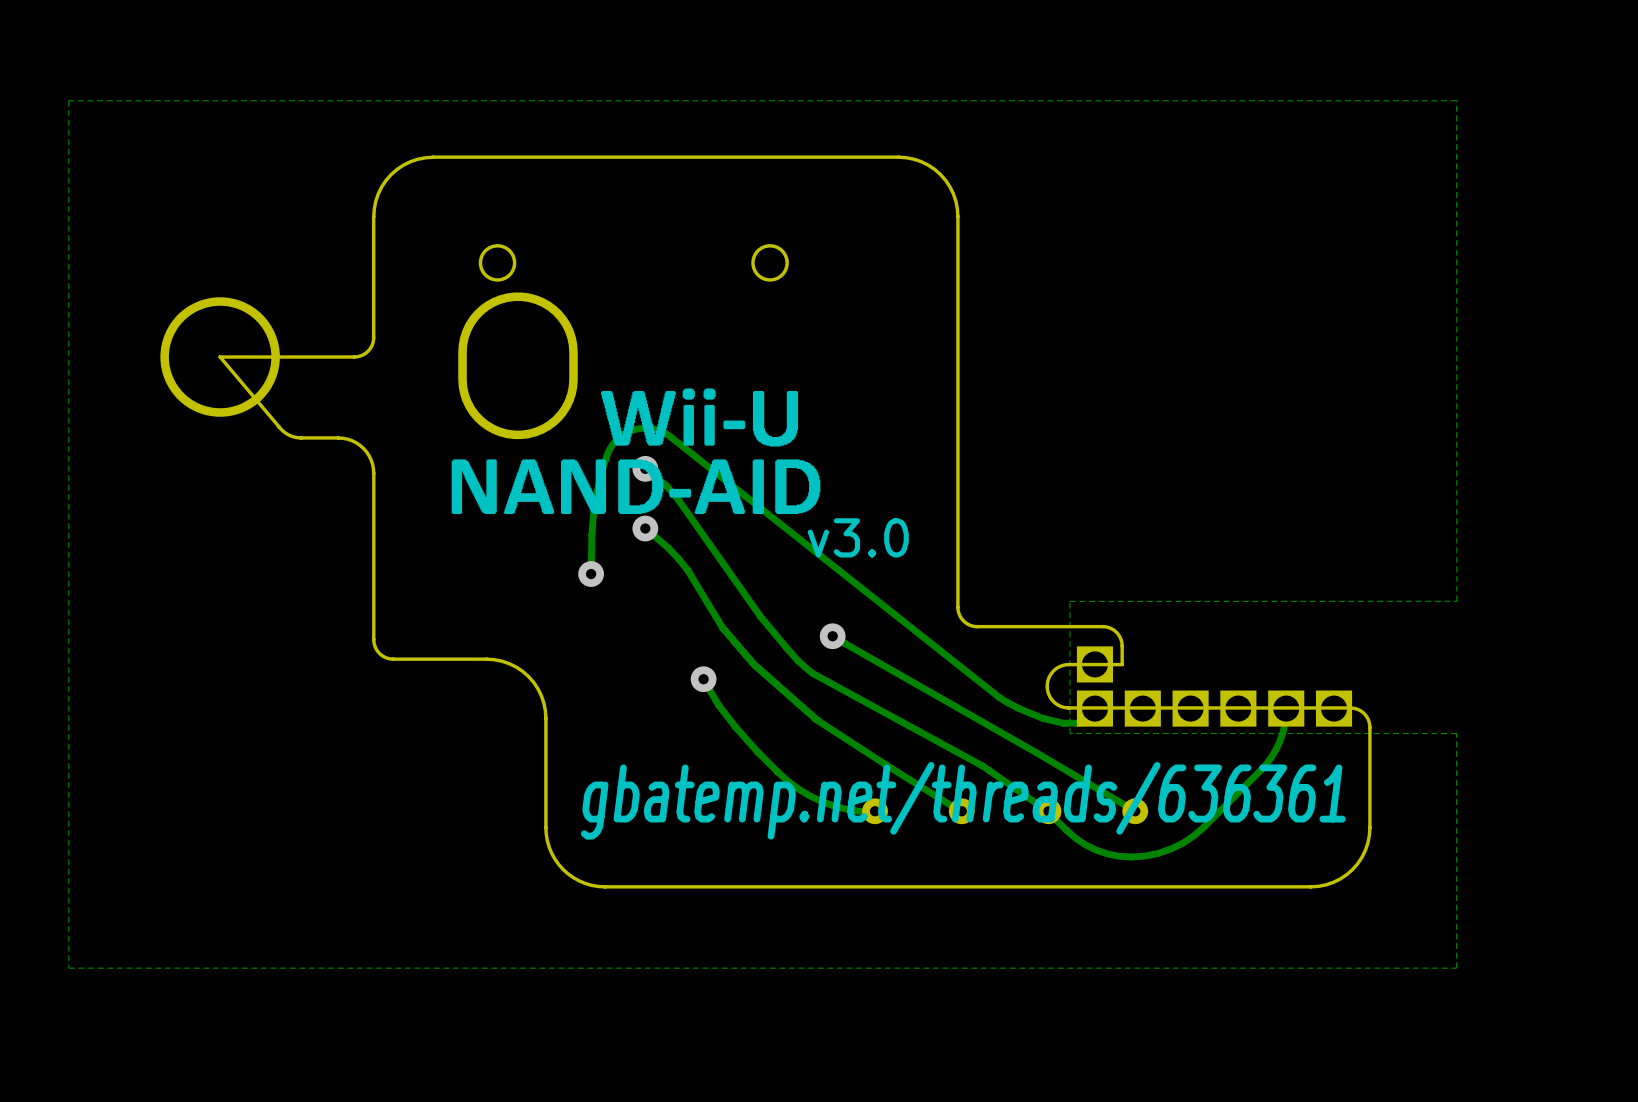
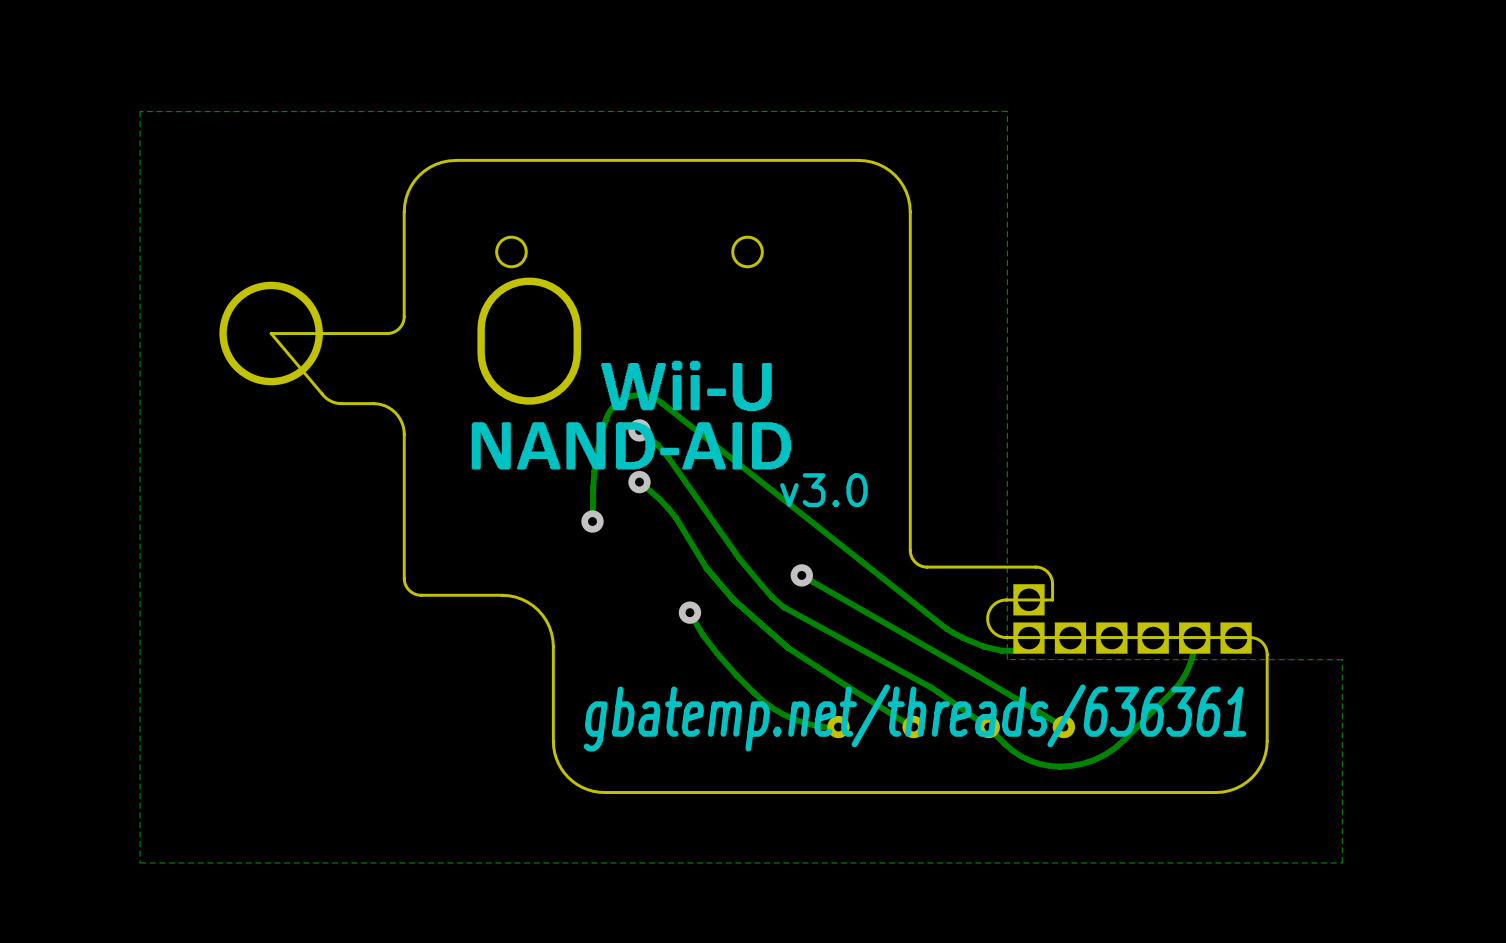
zone outline: (68, 100) (1456, 100) (1456, 601) (1069, 601) (1069, 733) -> (140, 111) (1007, 111) (1007, 659)

